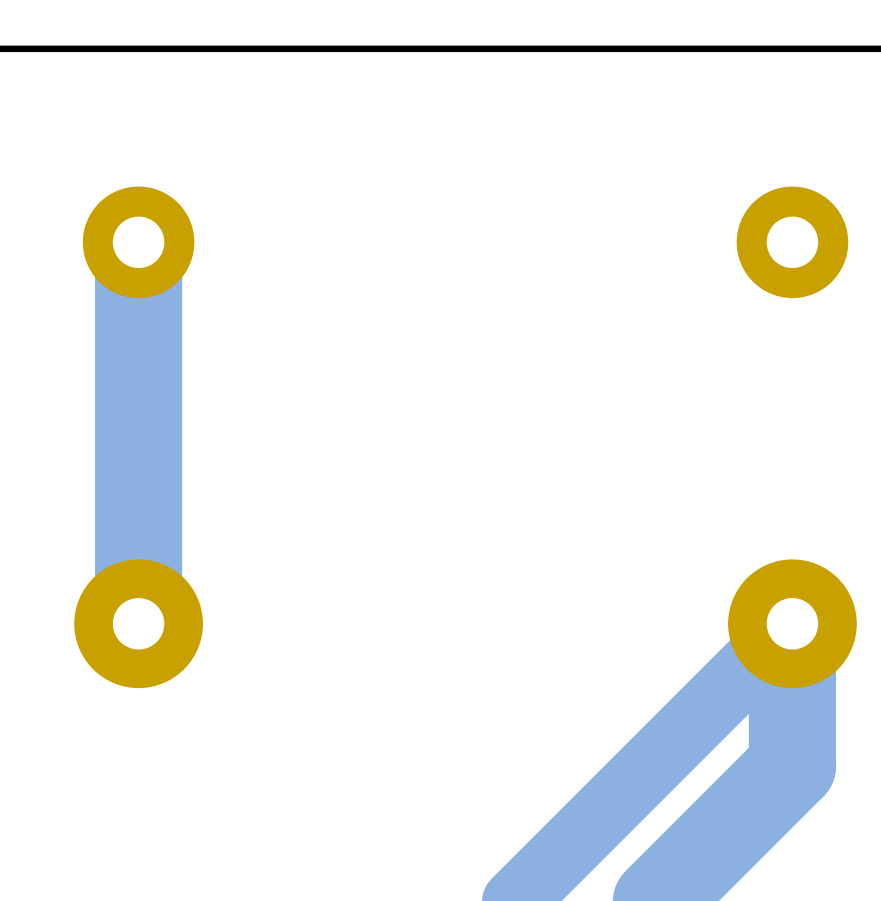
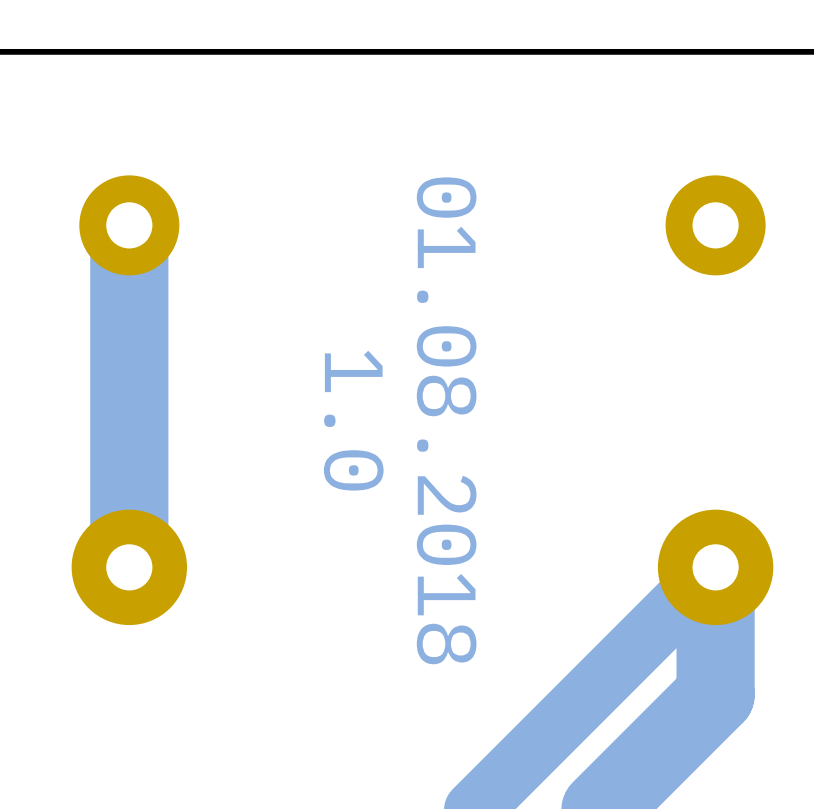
text: none -> 1.0 (353, 420)
text: none -> 01.08.2018 (446, 420)

